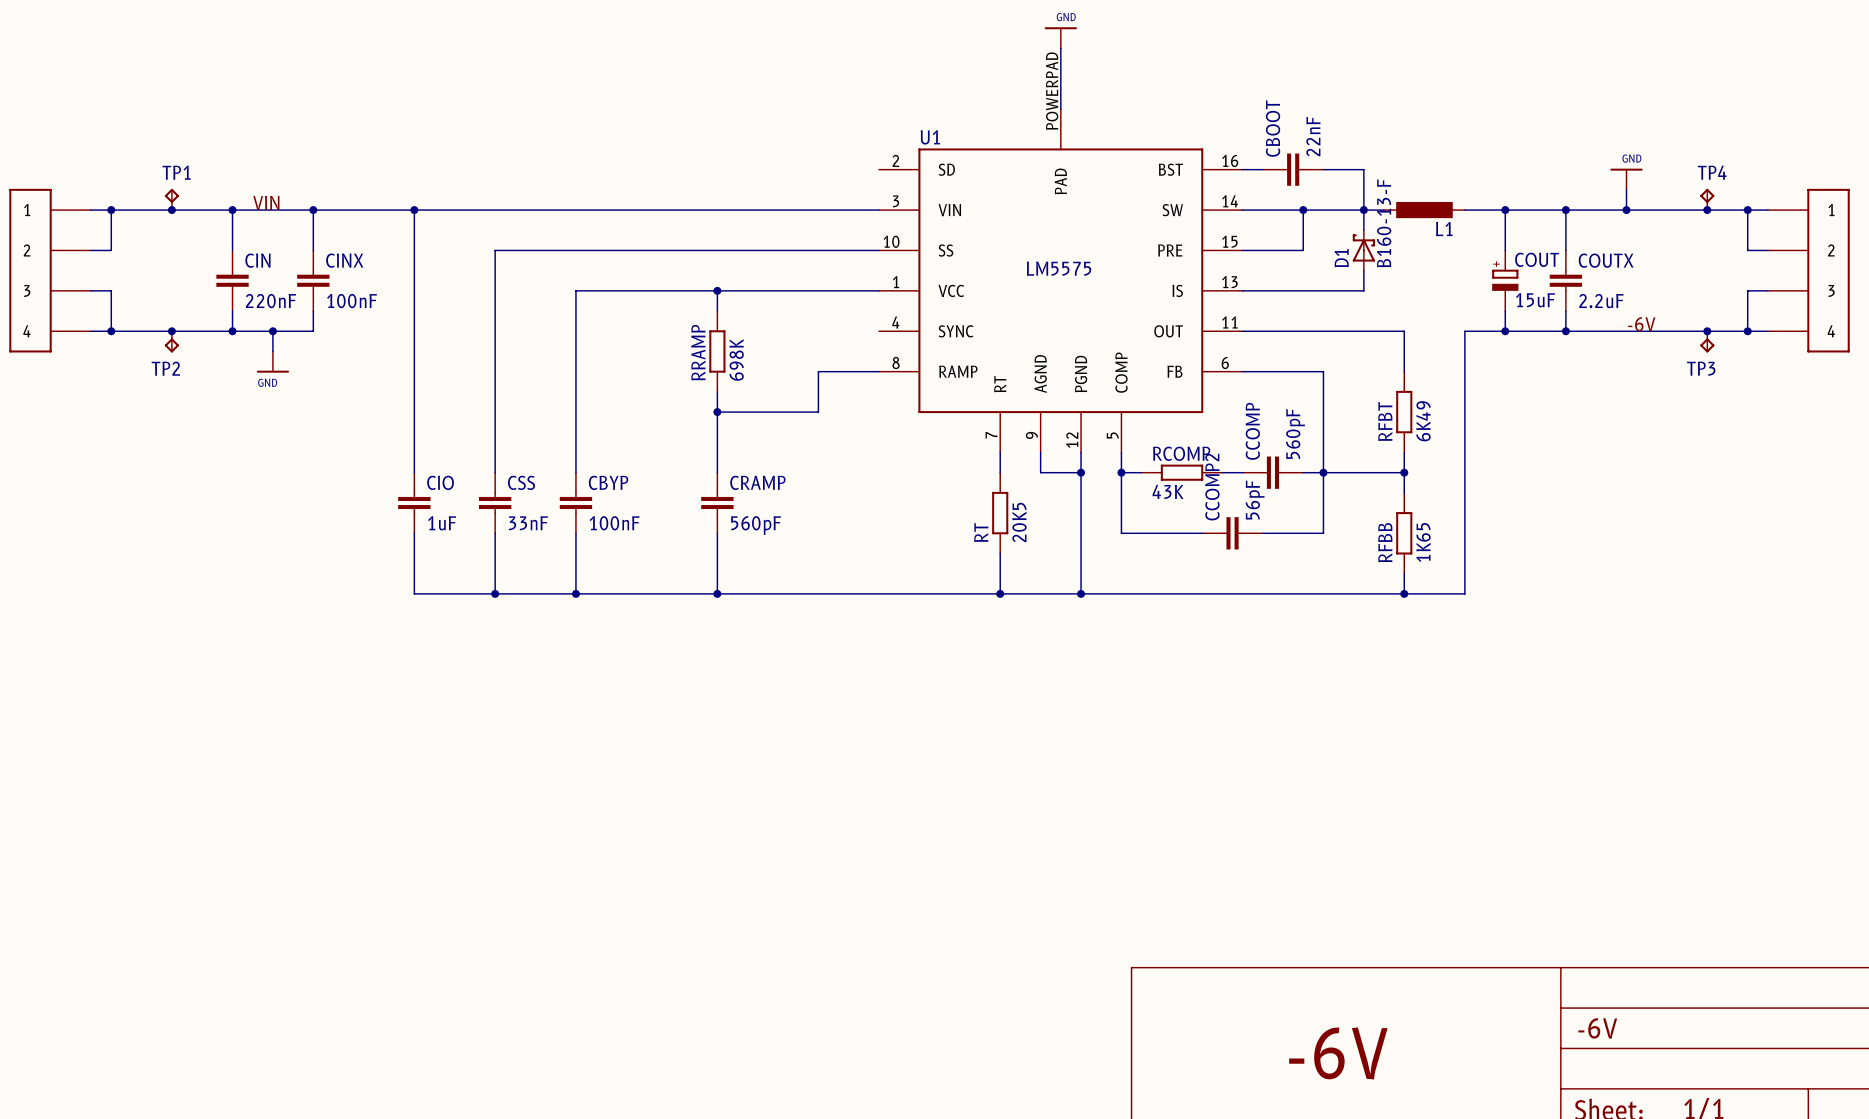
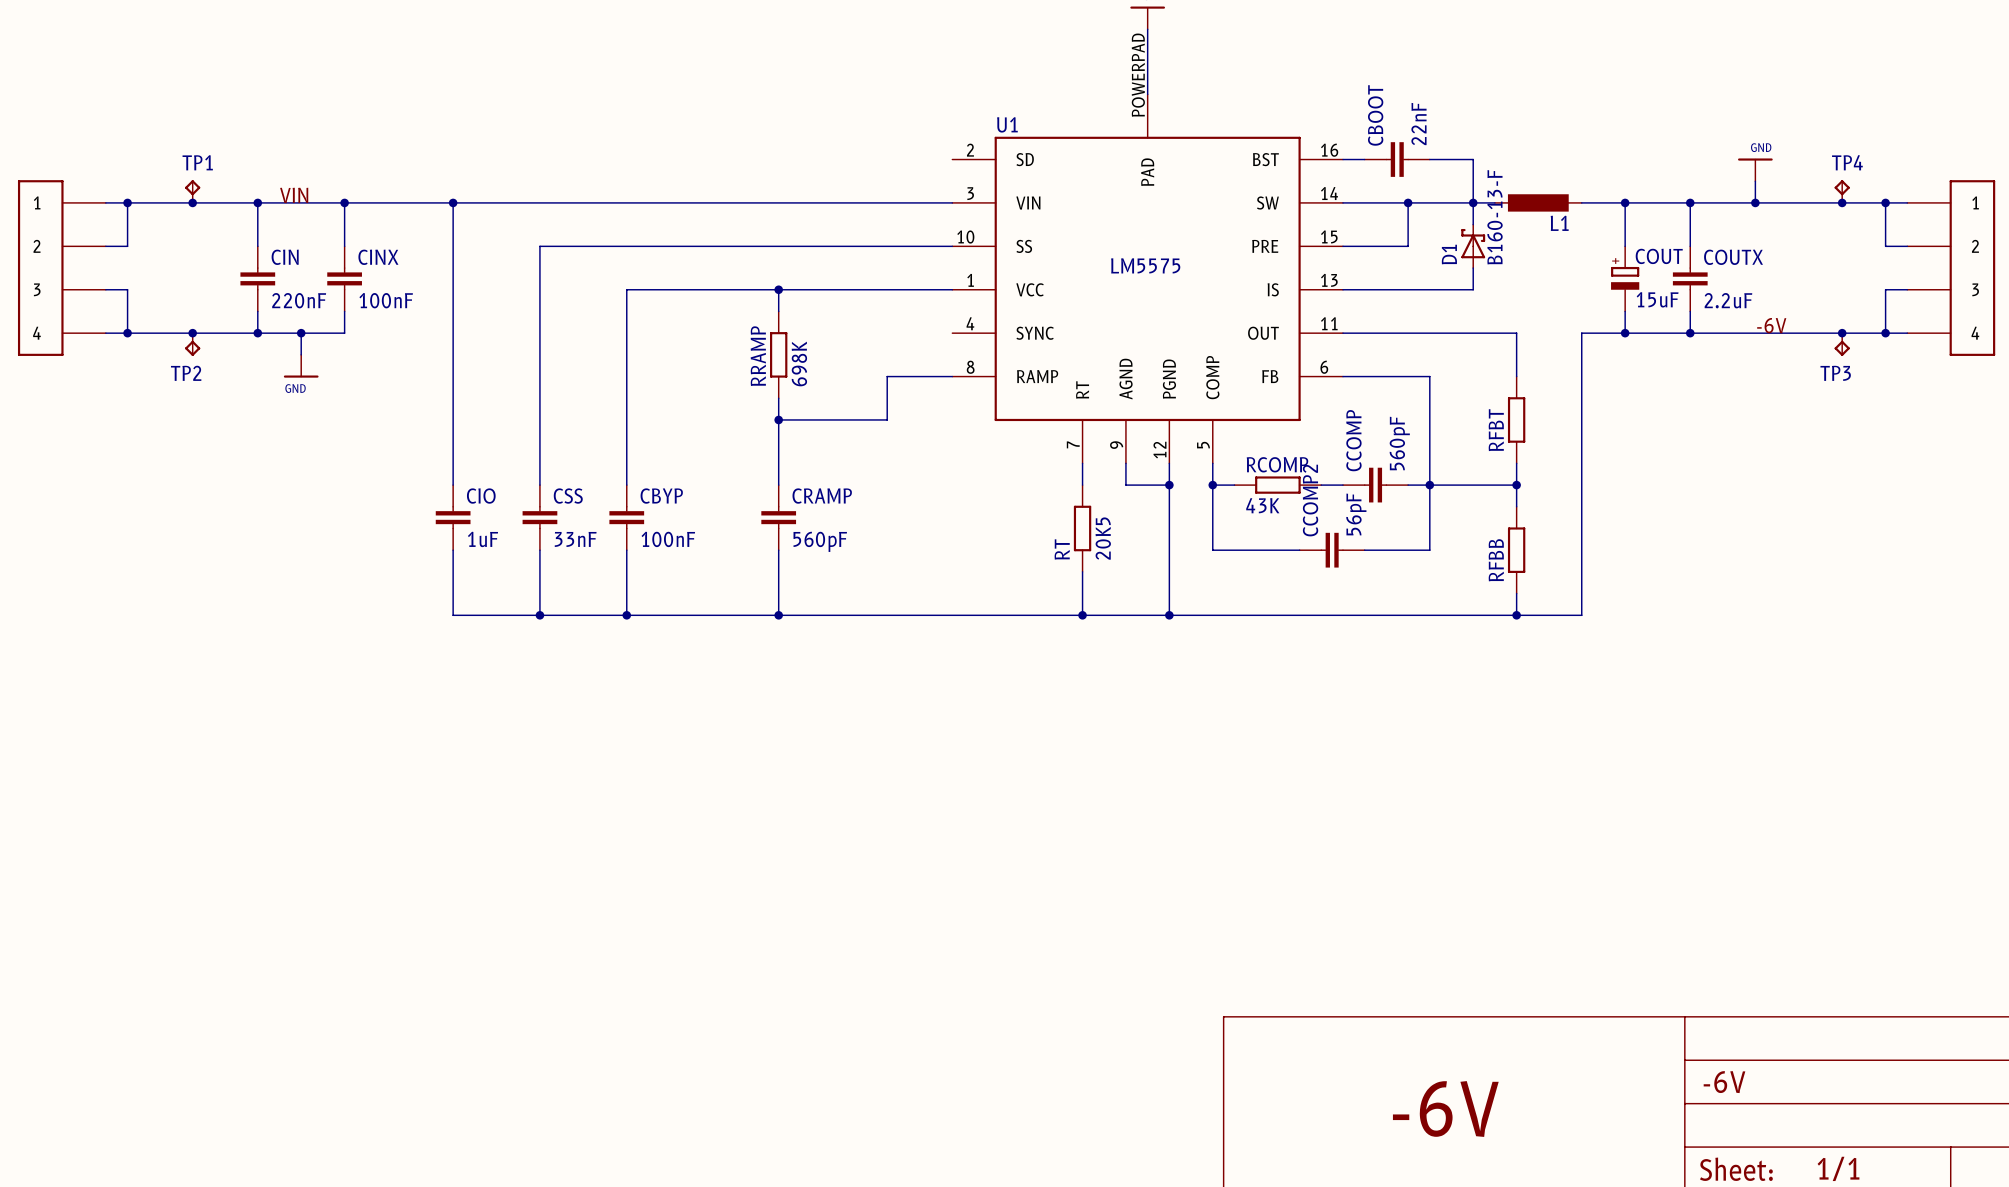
RFBT value: 6K49 (1423, 421) -> none
RFBB value: 1K65 (1423, 542) -> none

